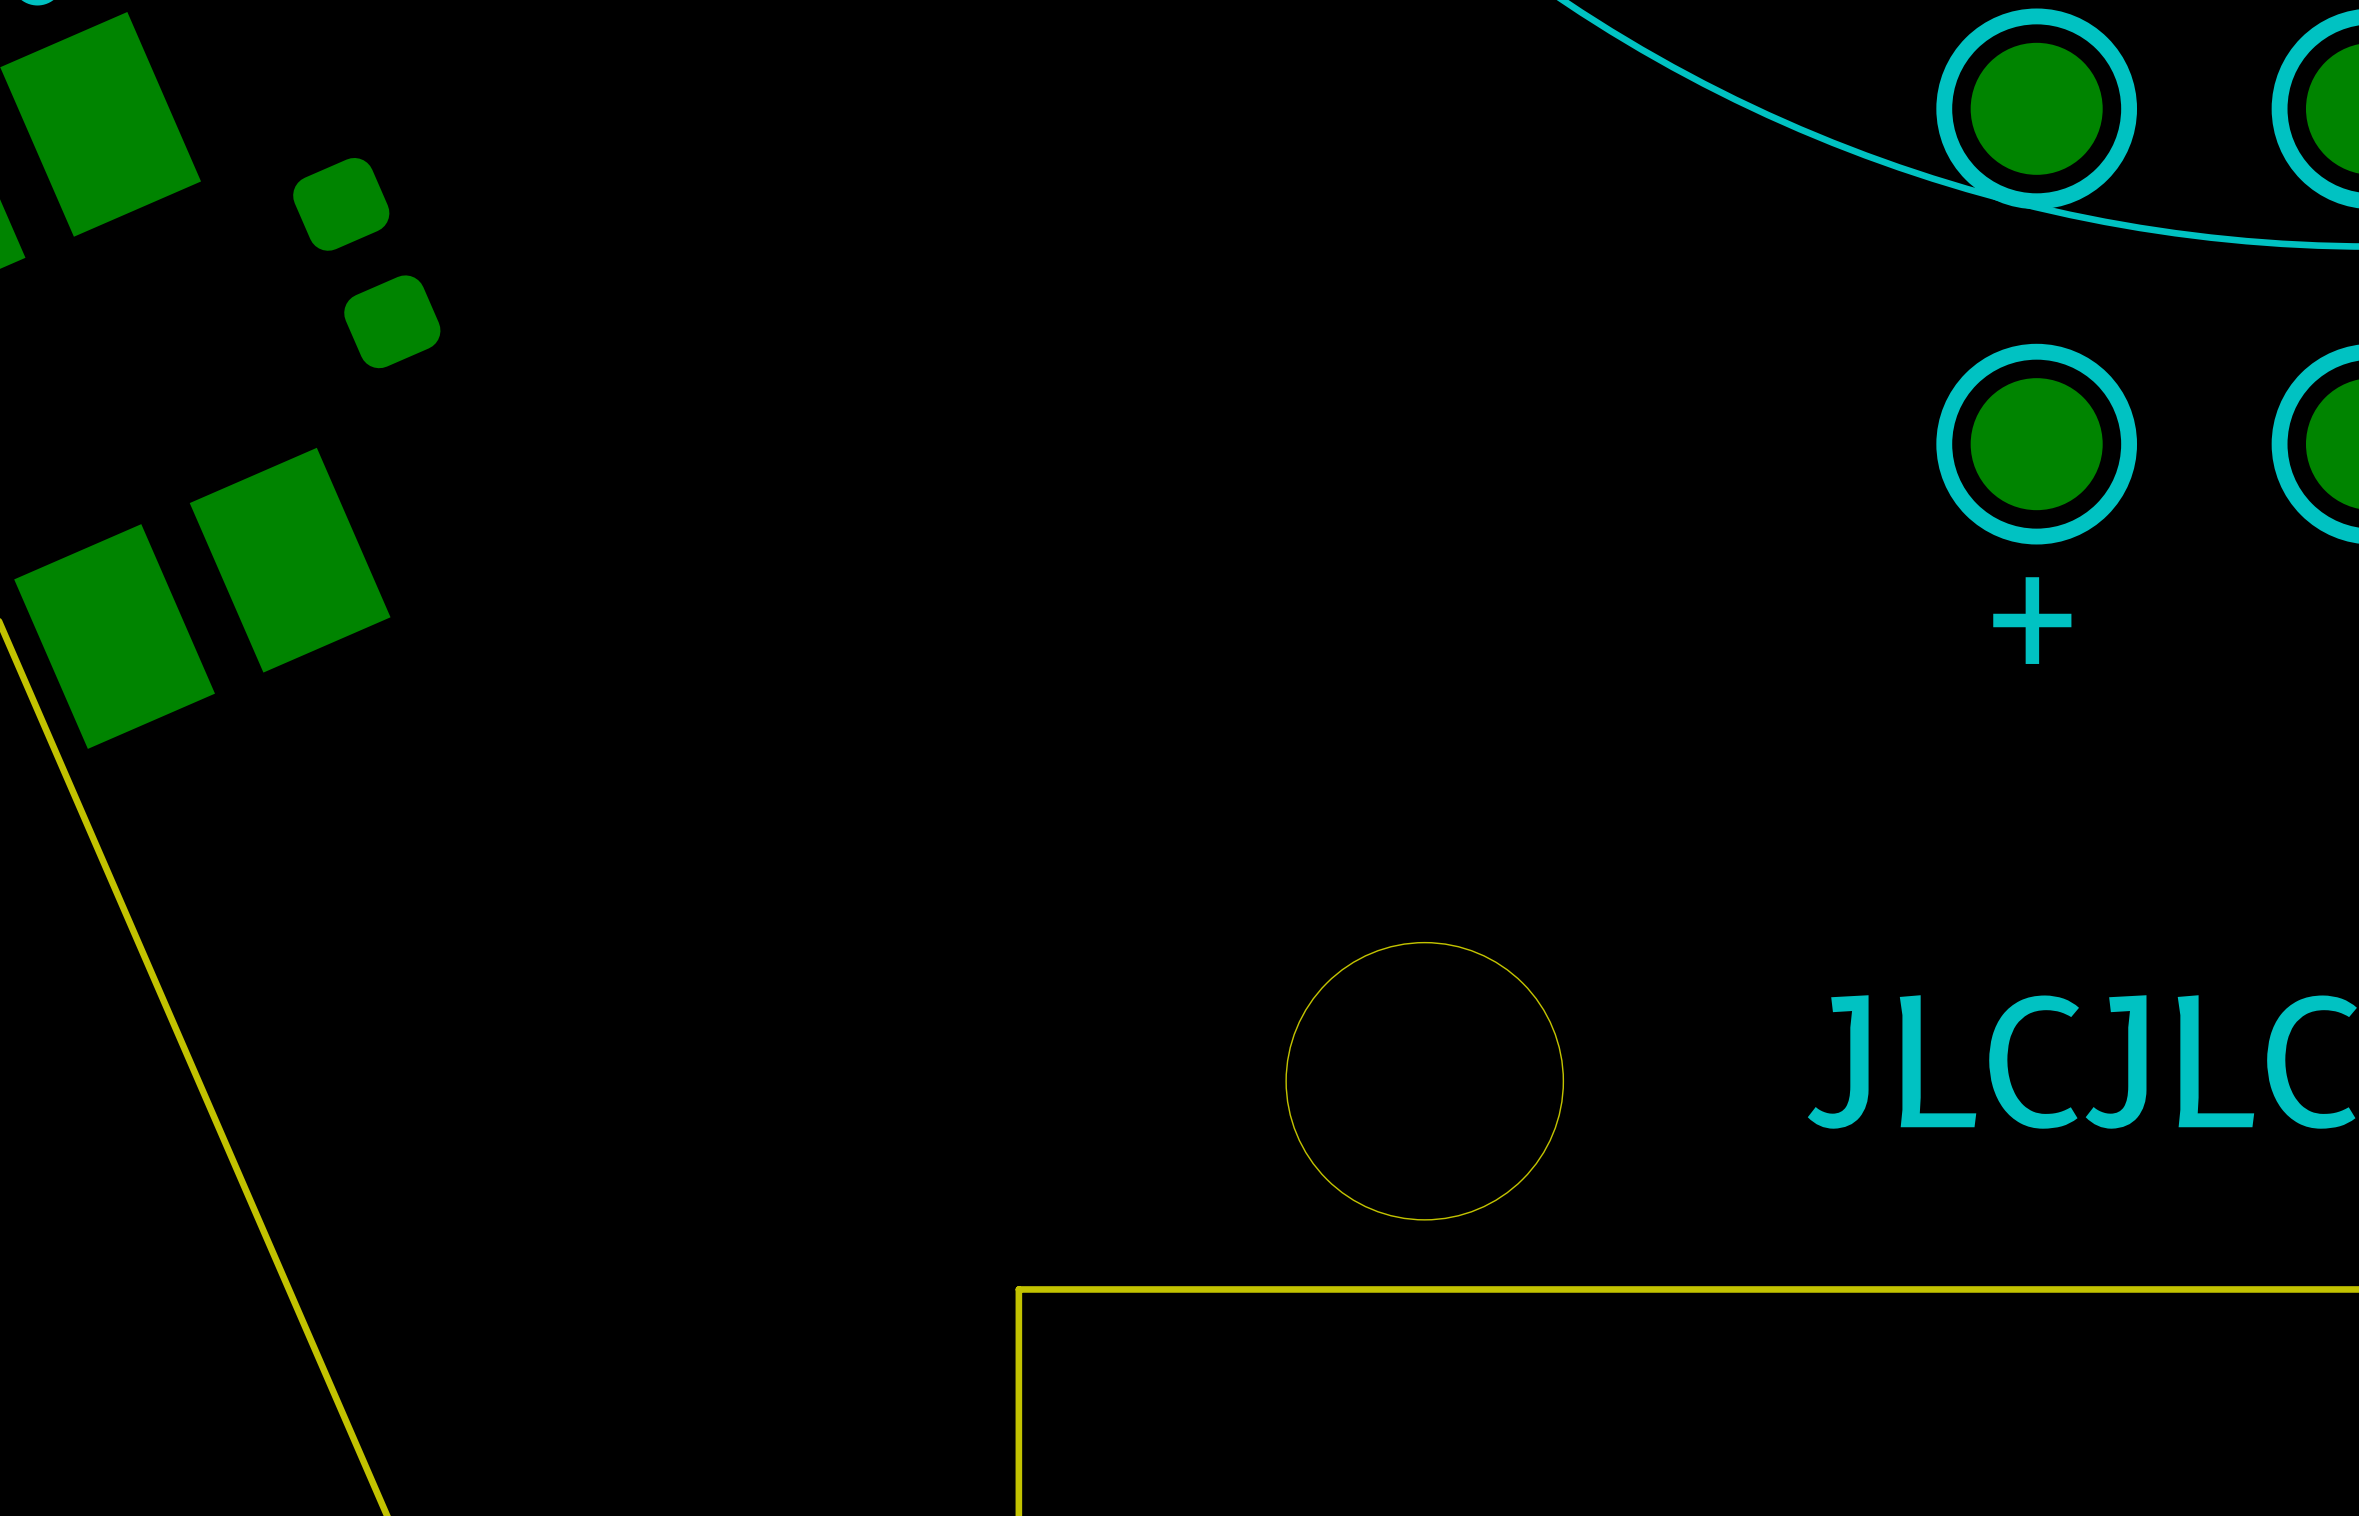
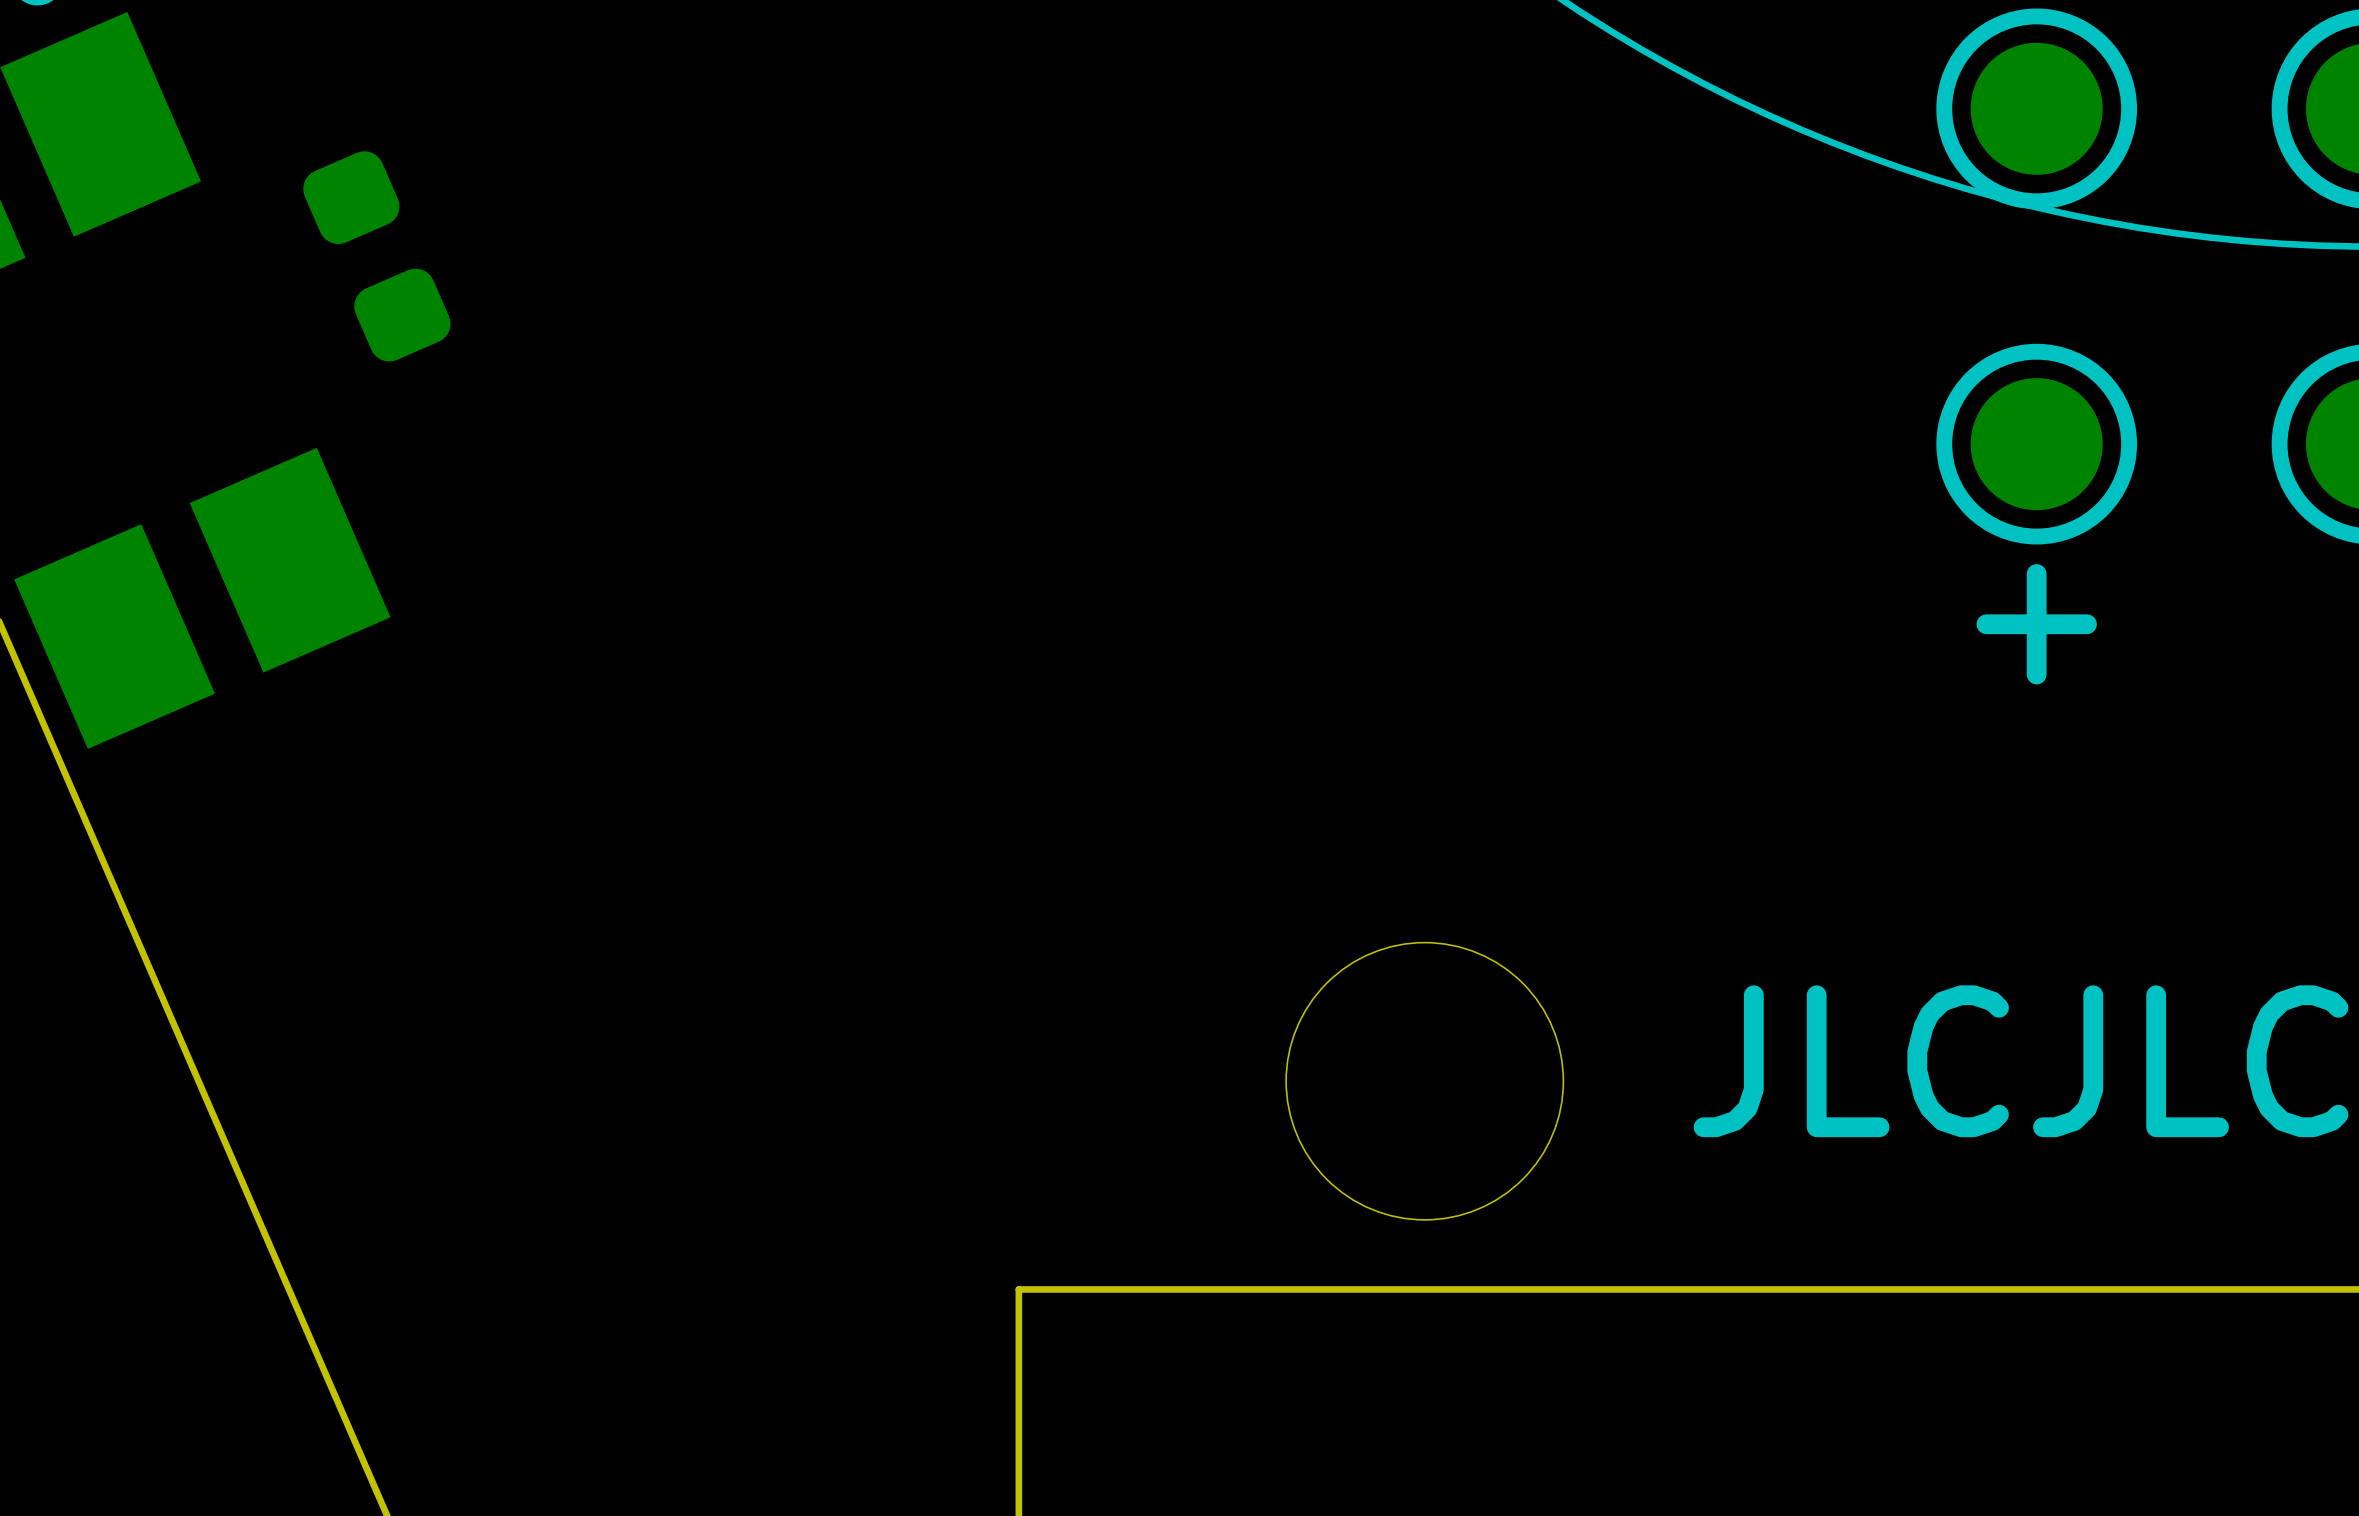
part position: (366, 263) -> (376, 256)

